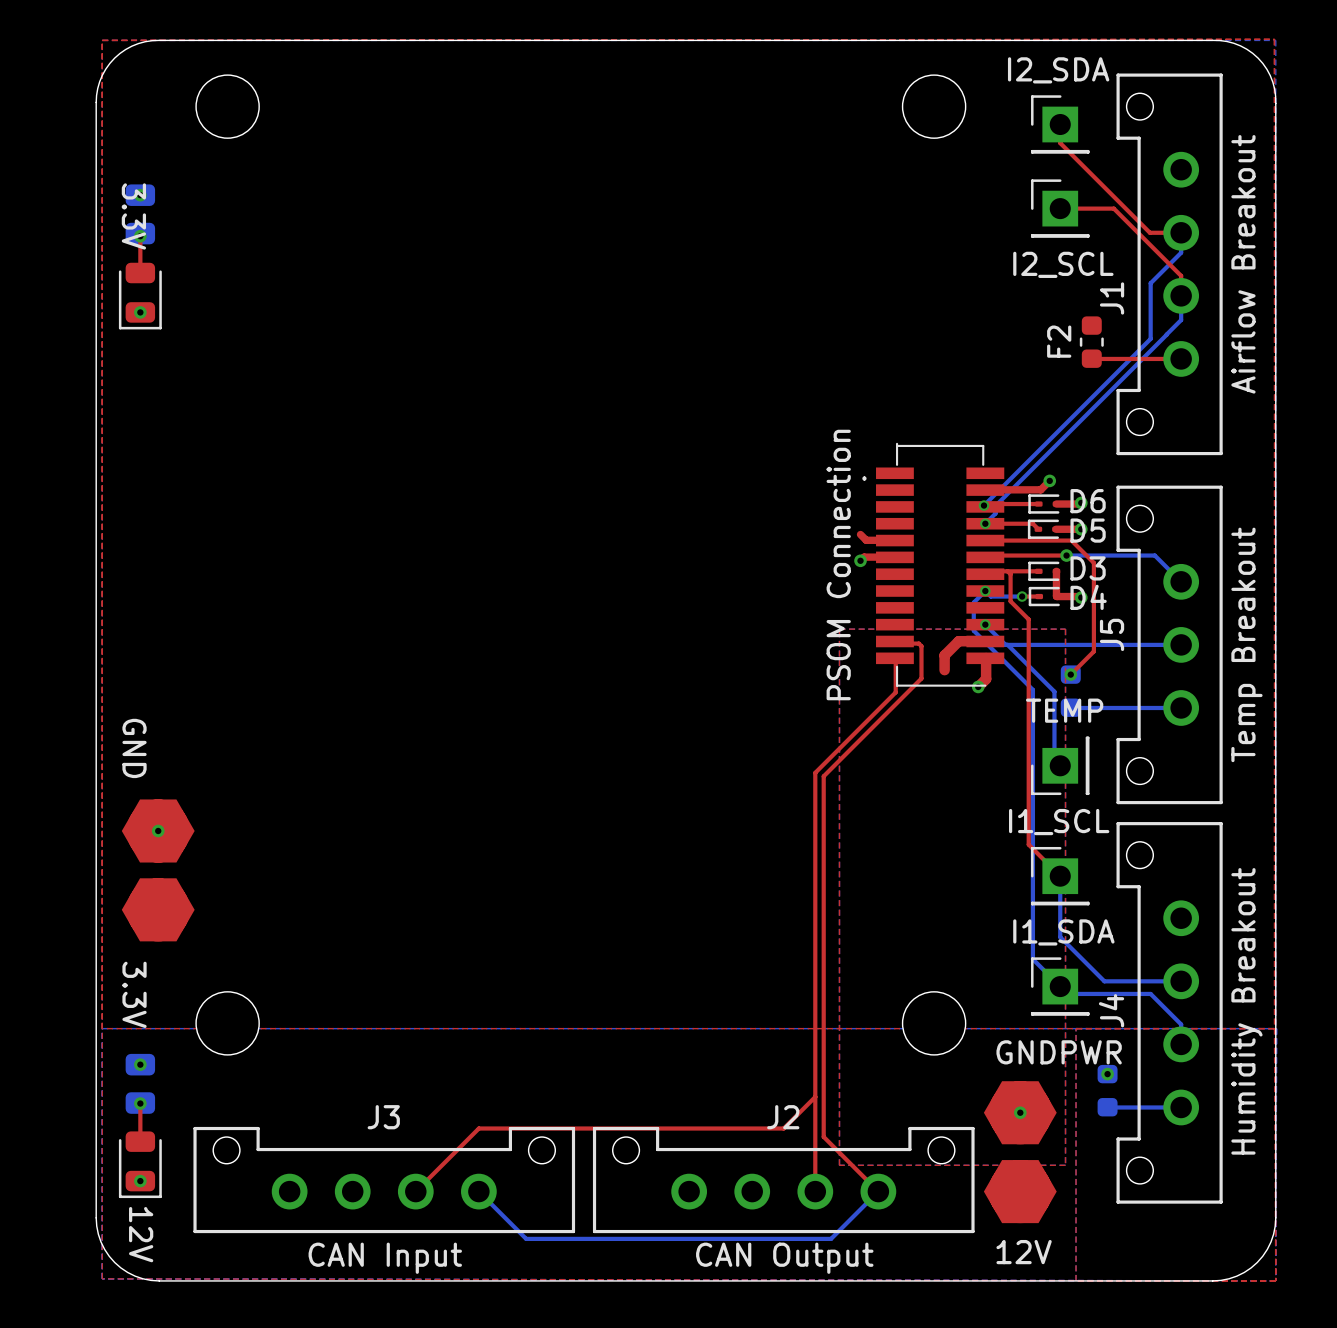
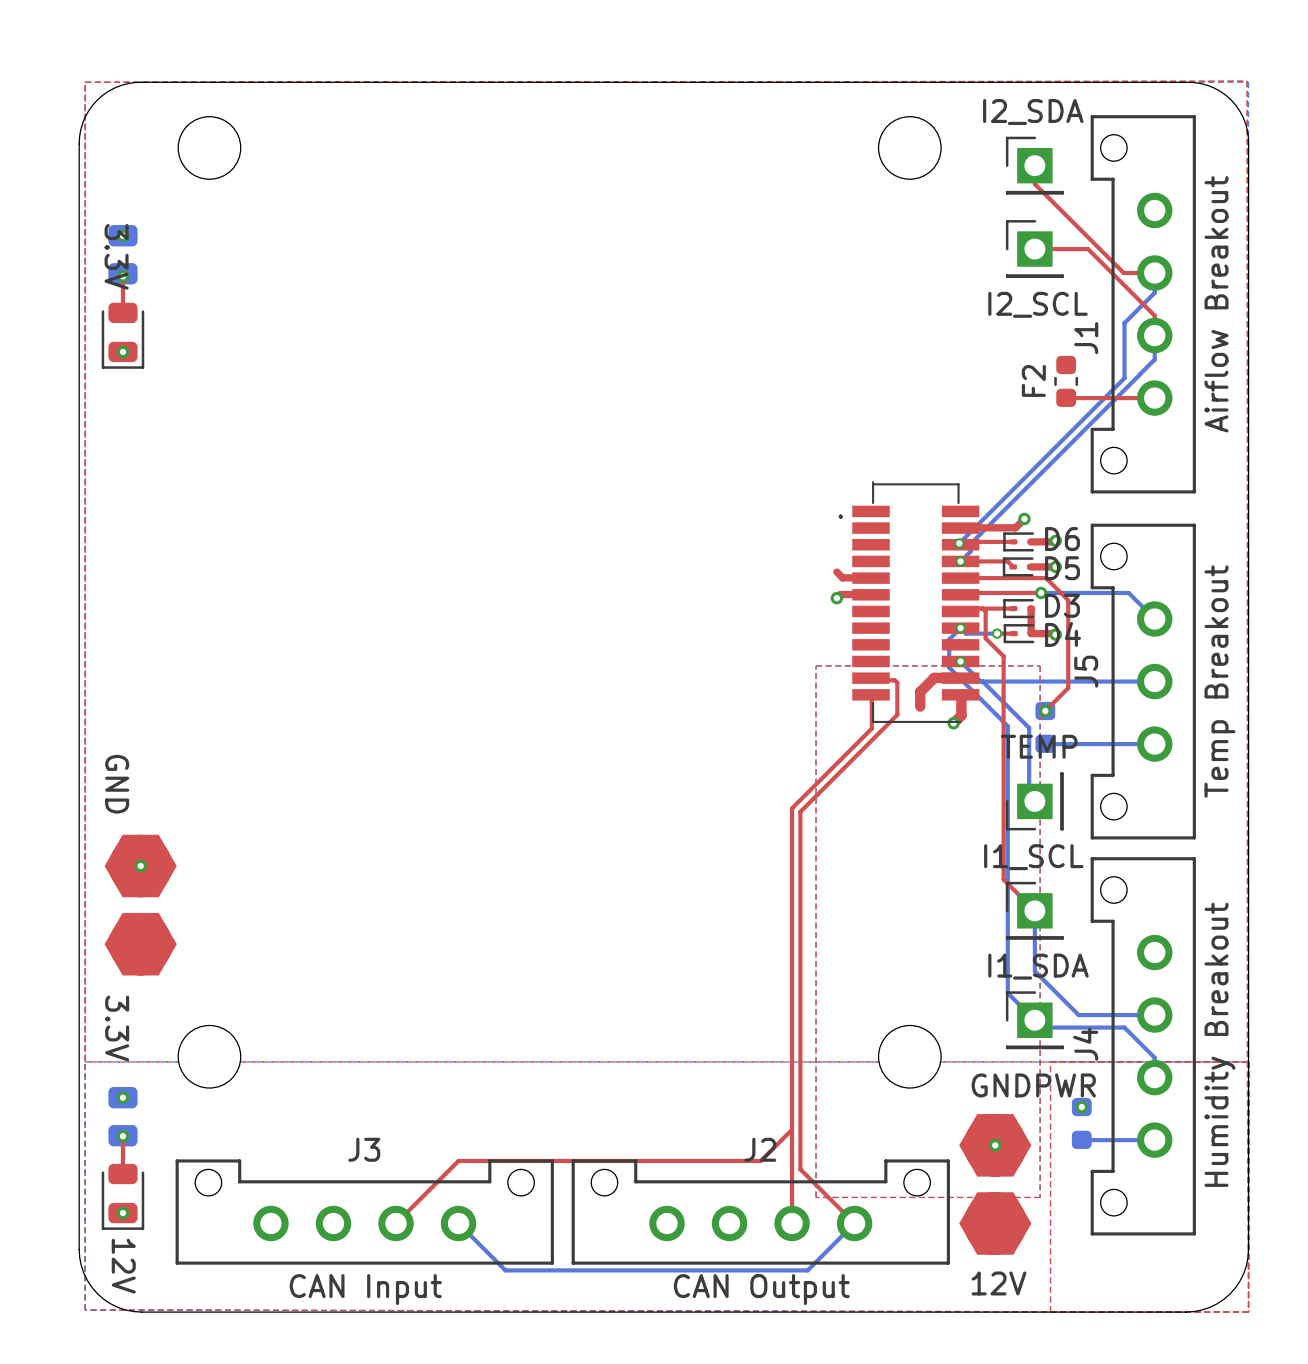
text: PSOM Connection (838, 565) -> none

